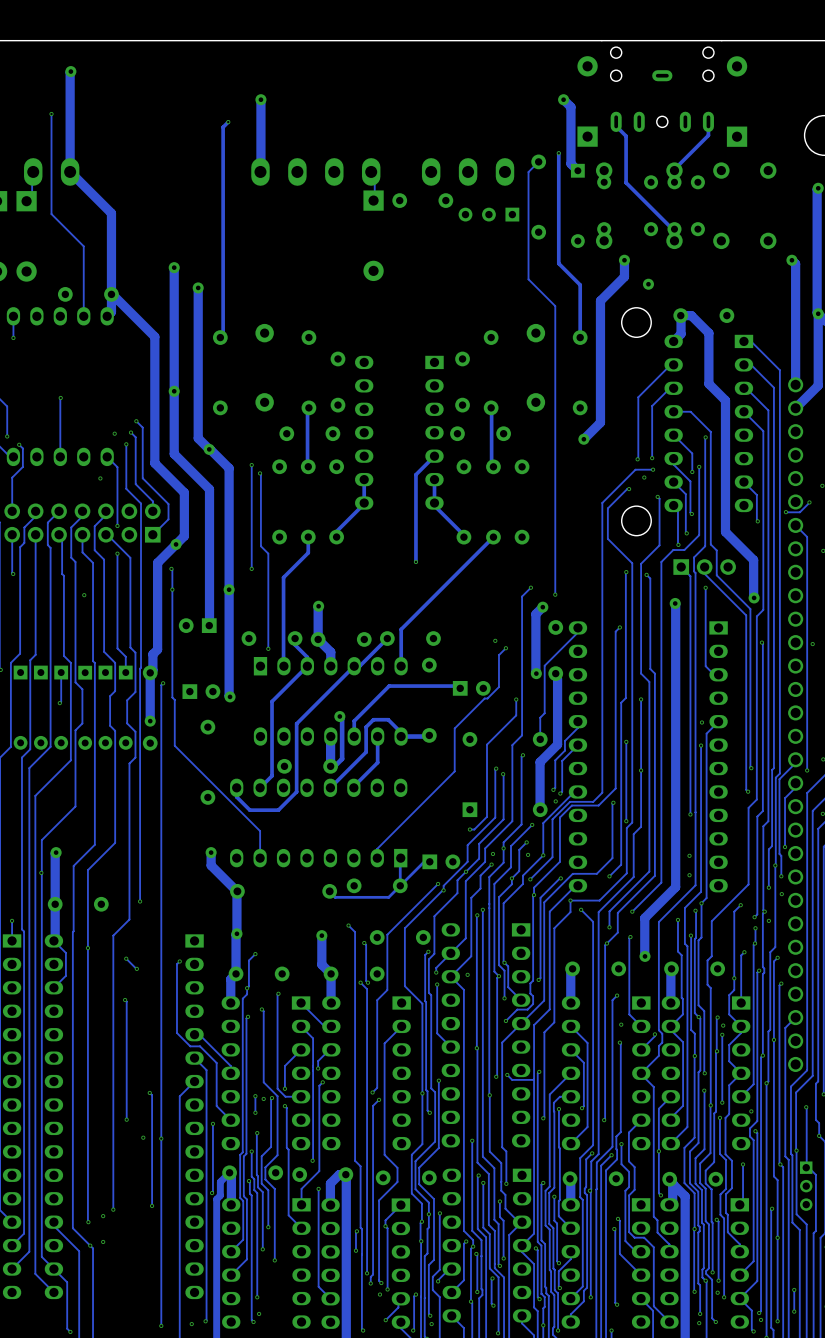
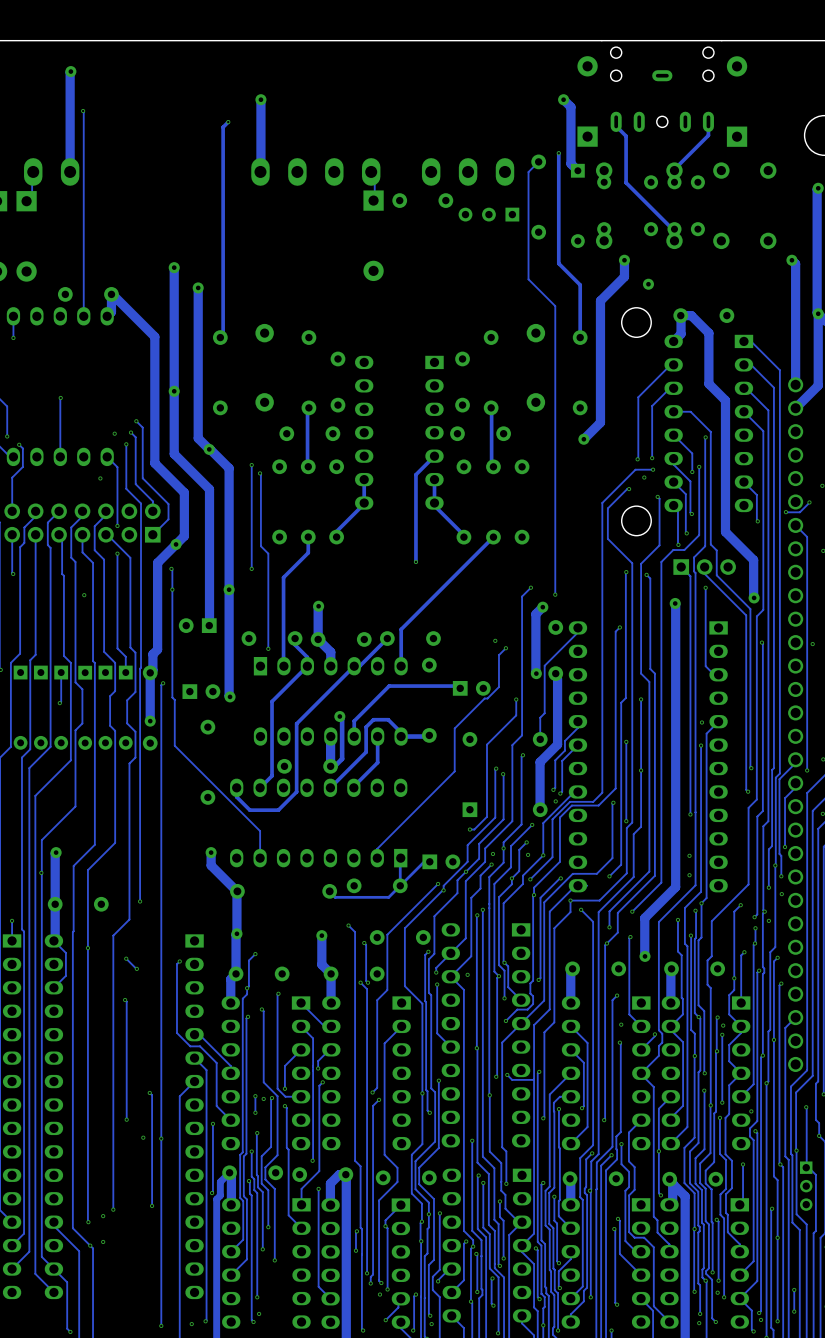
track: (51, 114) (51, 214) (83, 246) -> (83, 111) (83, 246)
via position: (51, 114) -> (83, 111)
track: (70, 171) (111, 213) (111, 294) -> none

